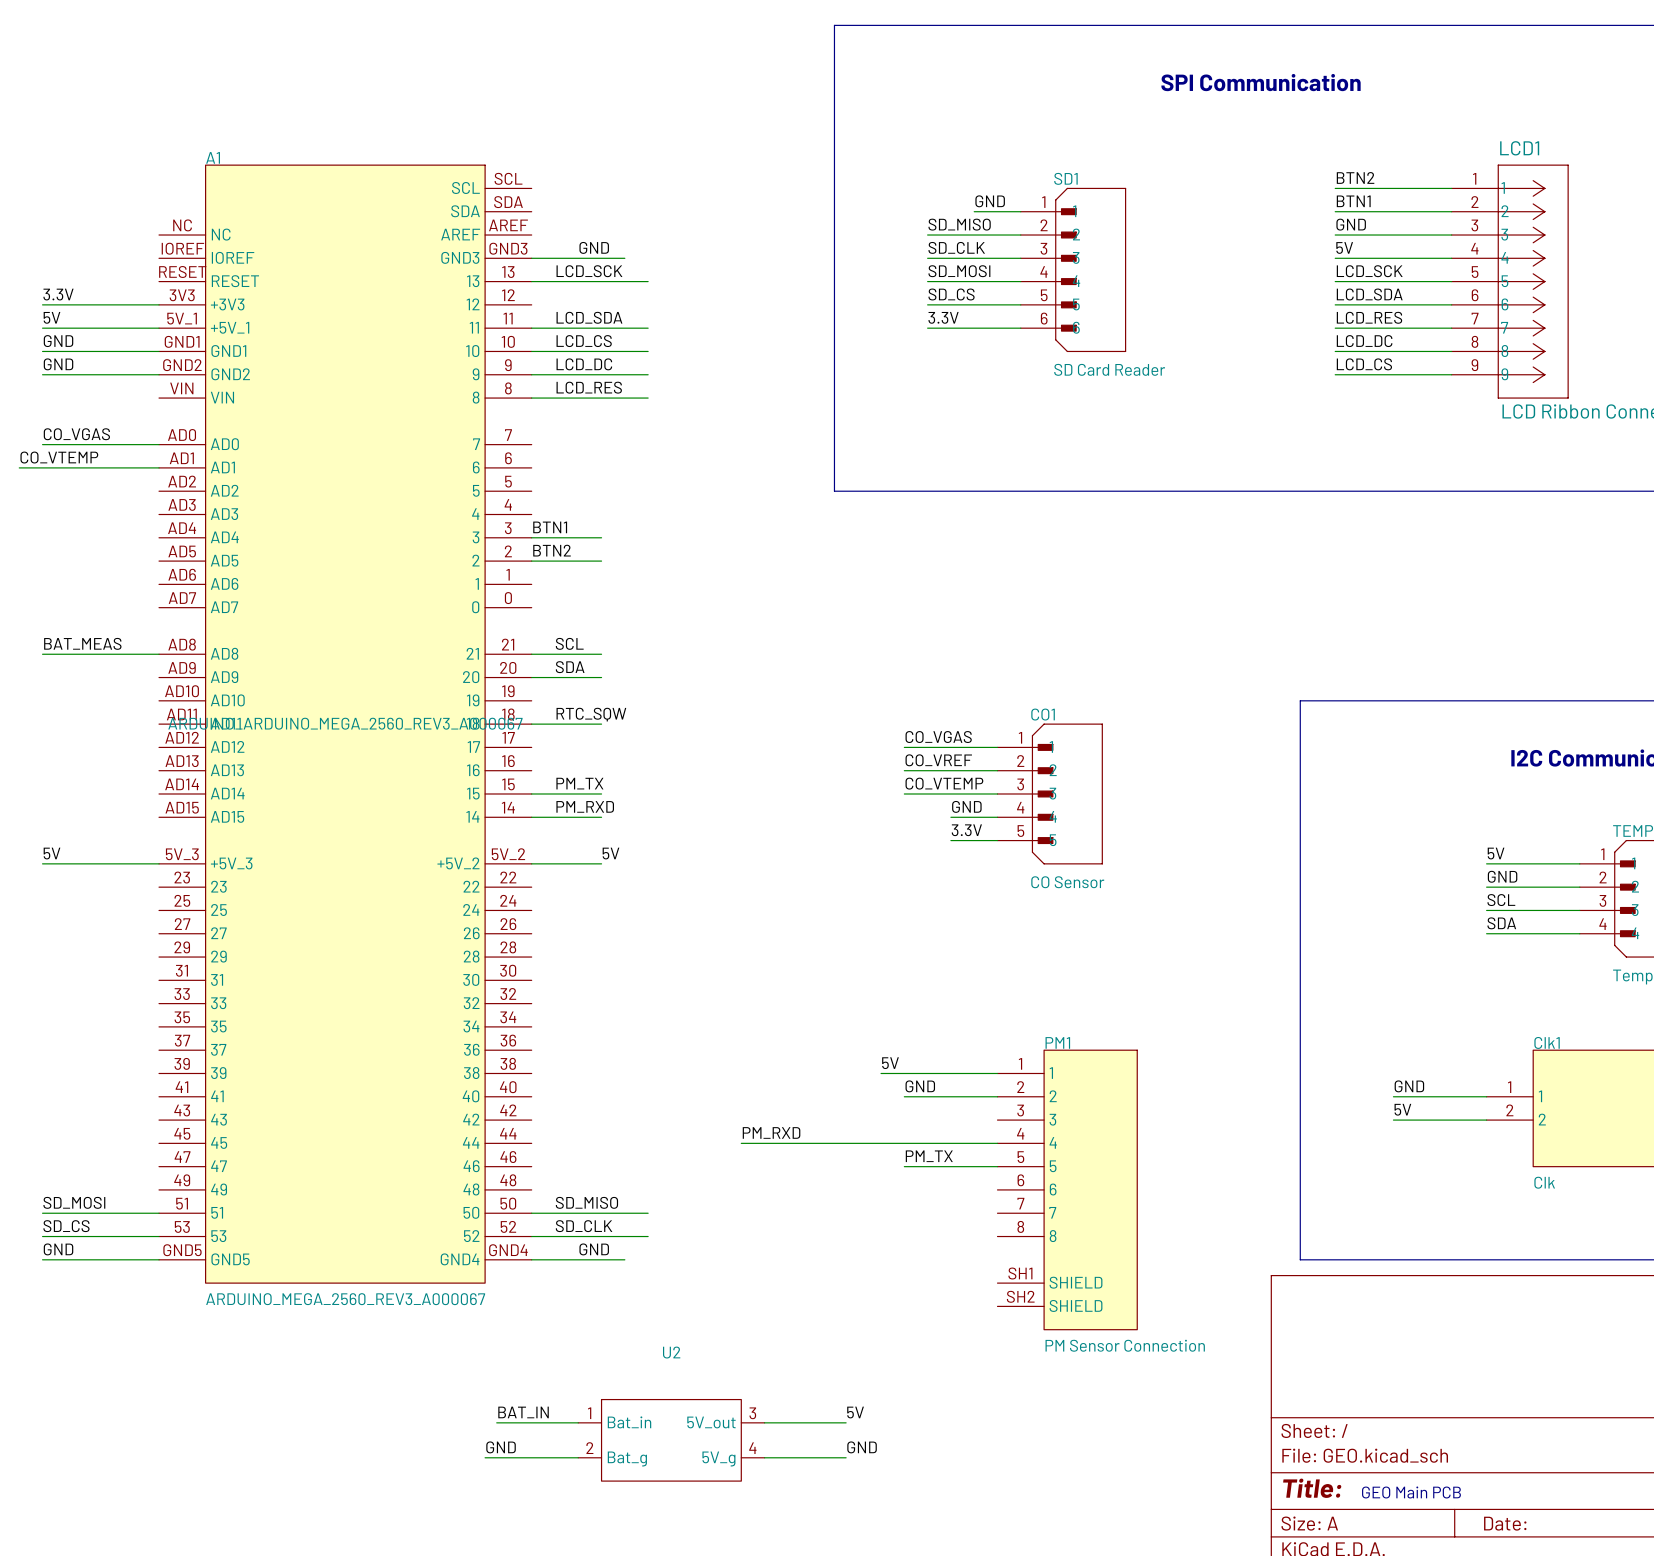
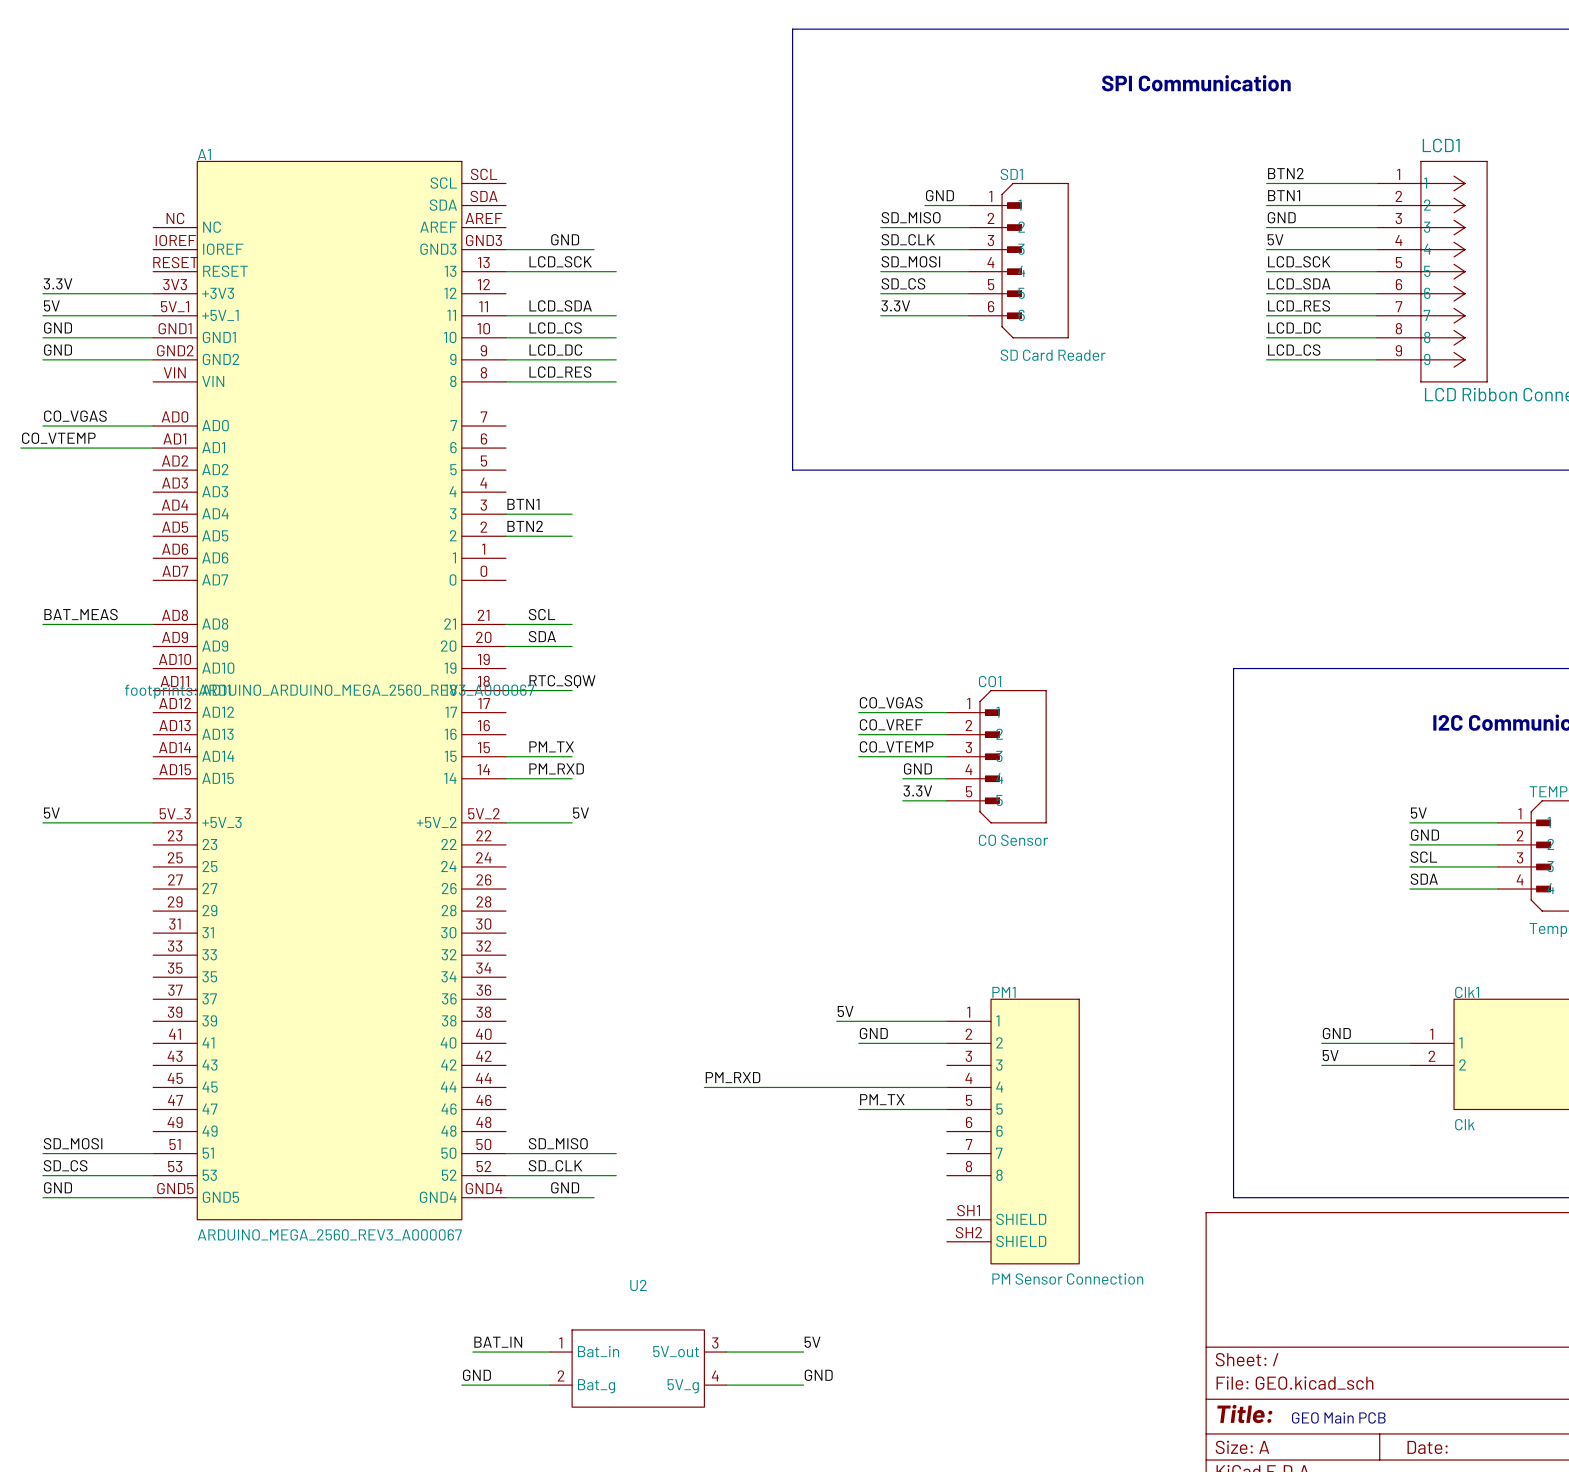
A1 text: ARDUINO_ARDUINO_MEGA_2560_REV3_A000067 (345, 723) -> footprints:ARDUINO_ARDUINO_MEGA_2560_REV3_A000067 (329, 691)

